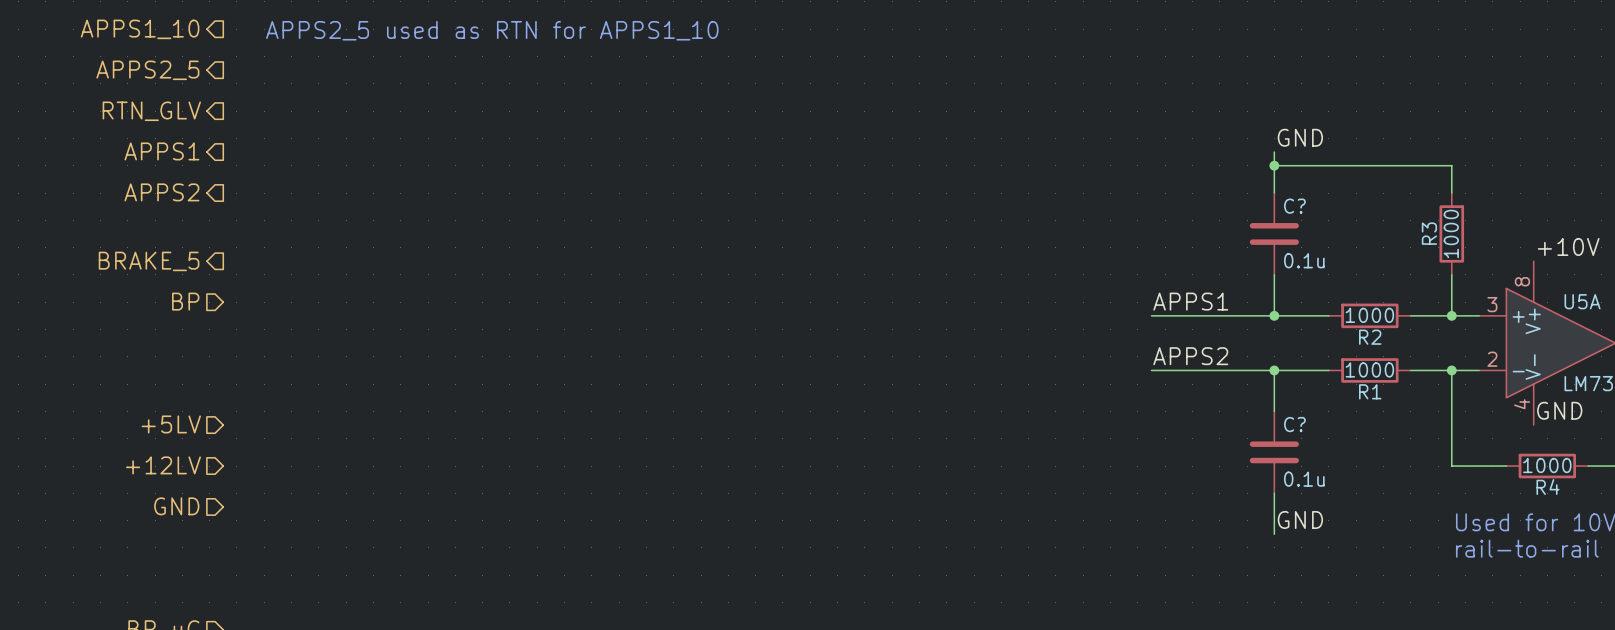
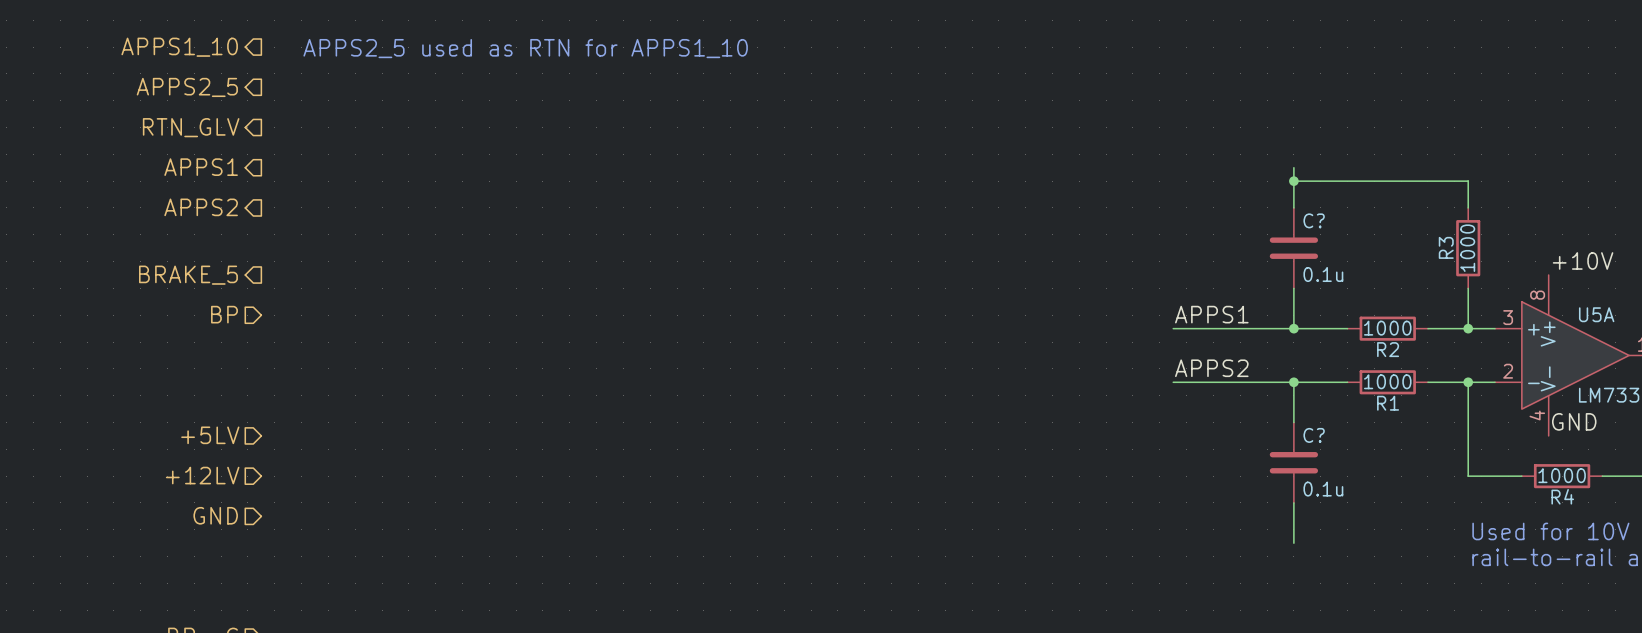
label: GND (1300, 137) -> none
label: GND (1300, 519) -> none

